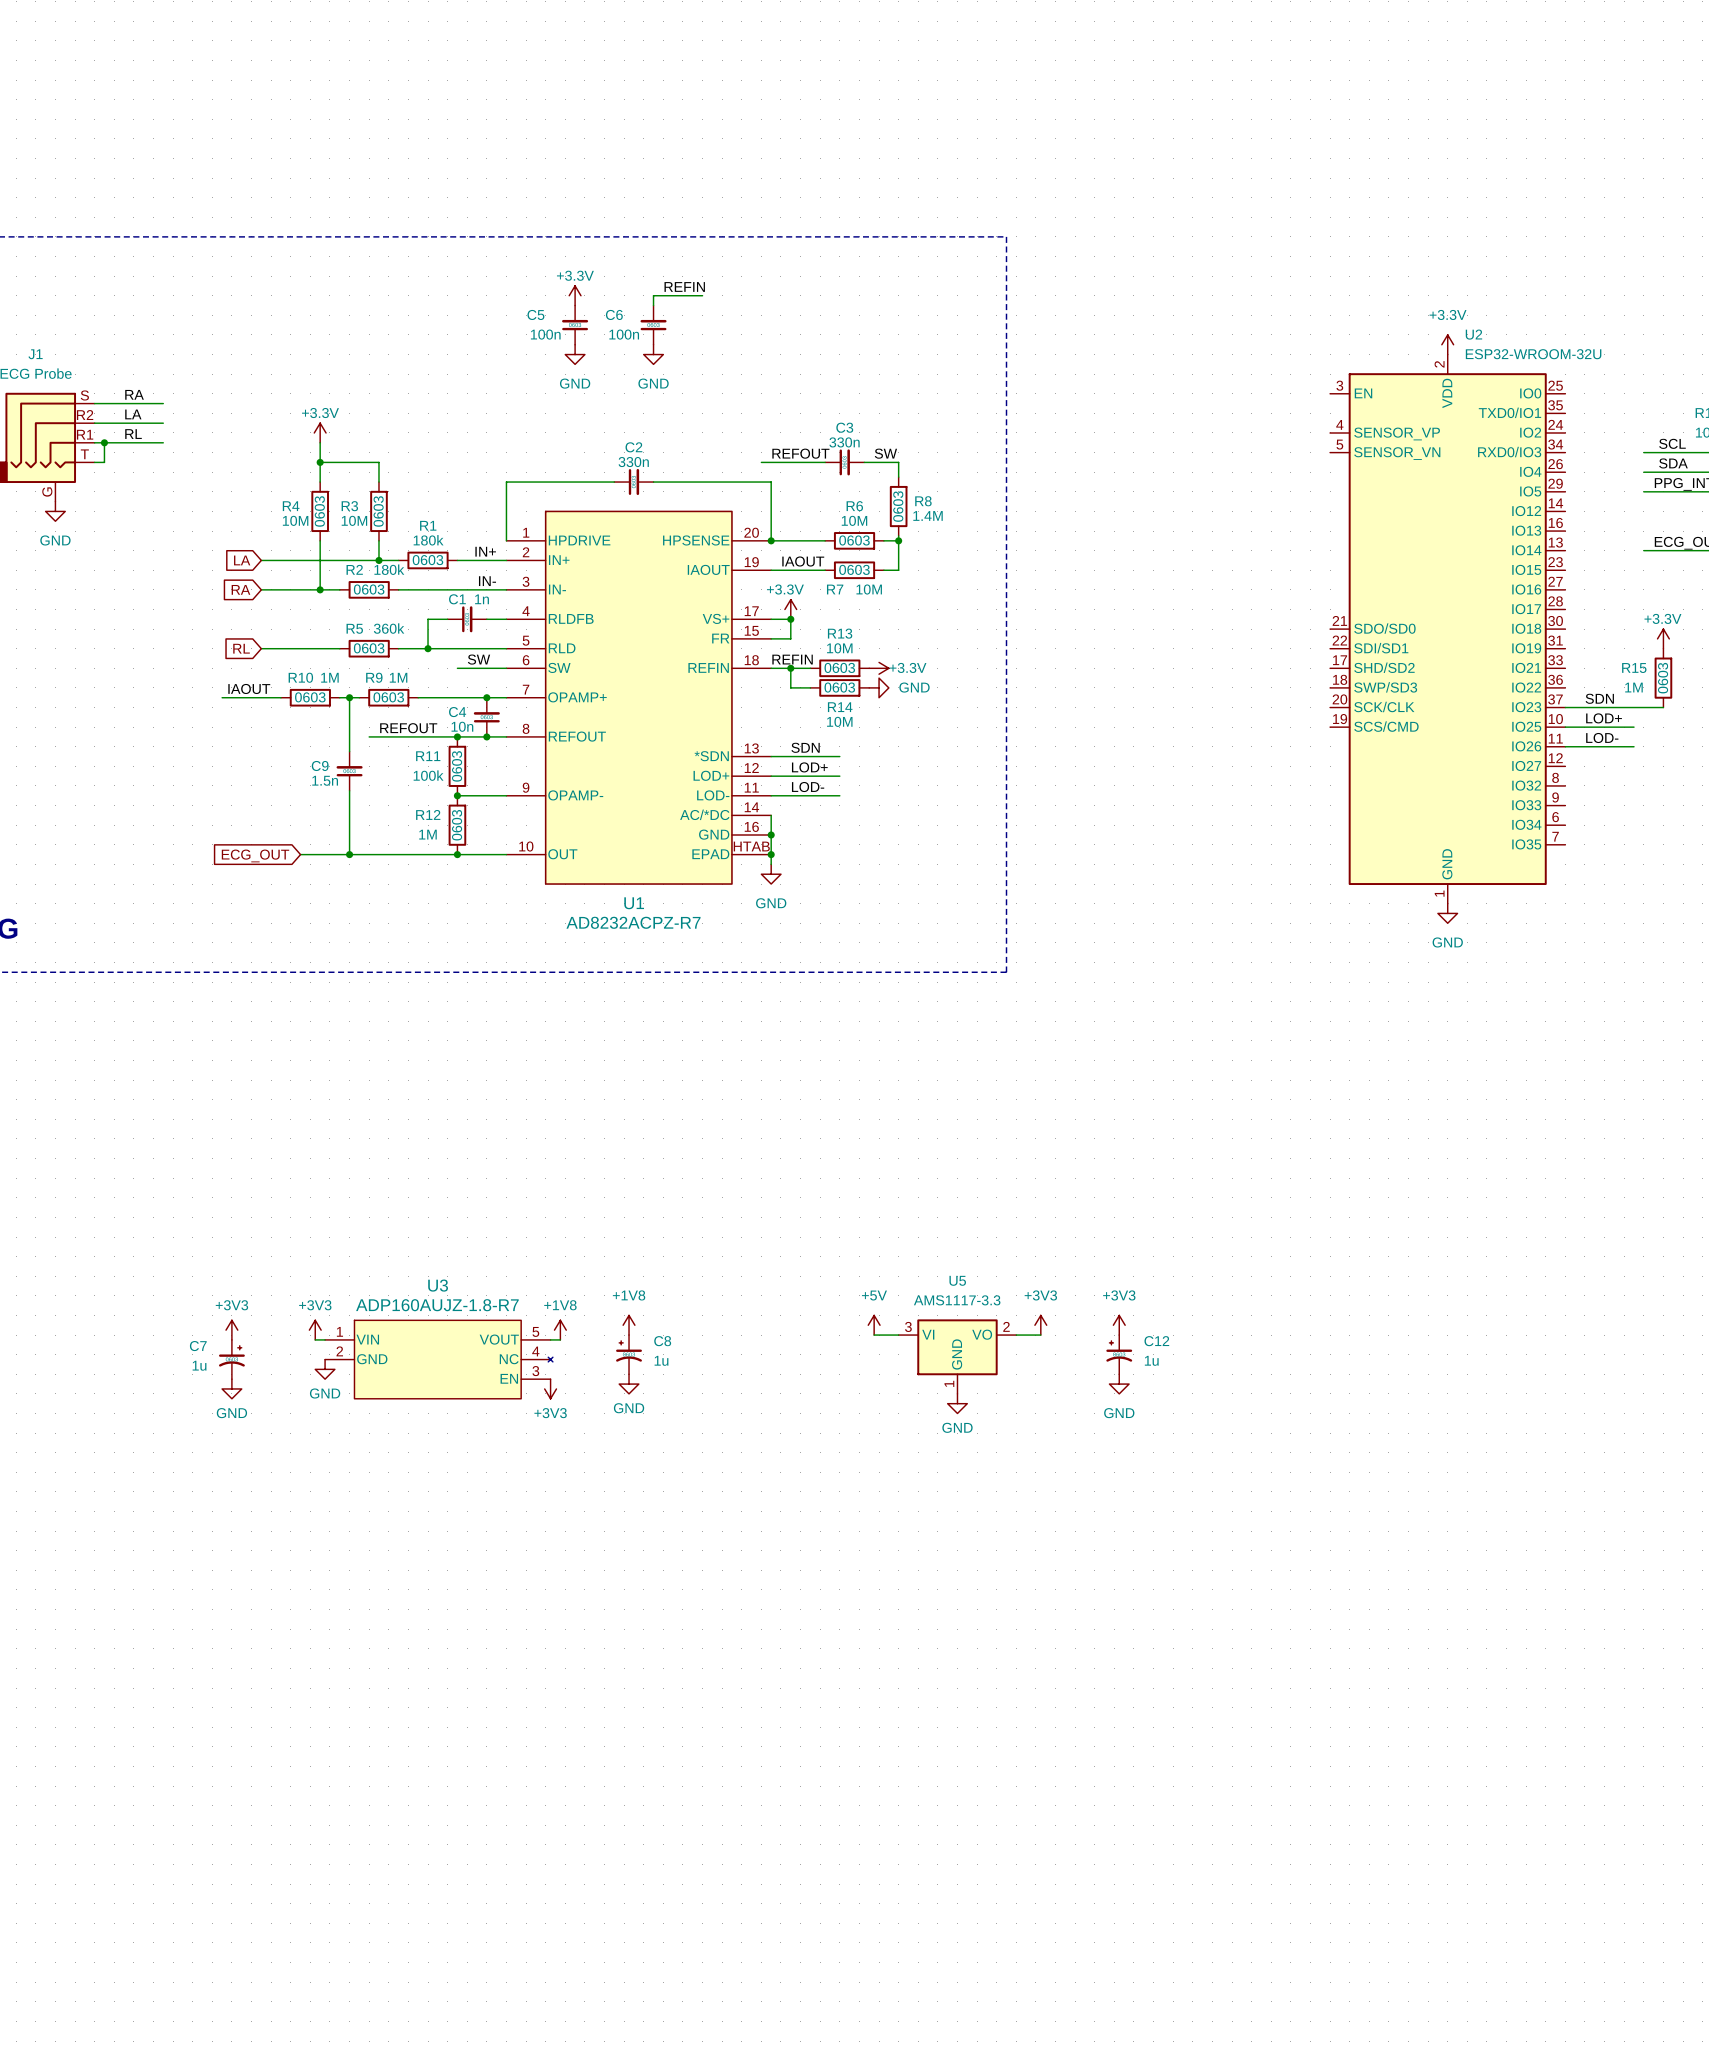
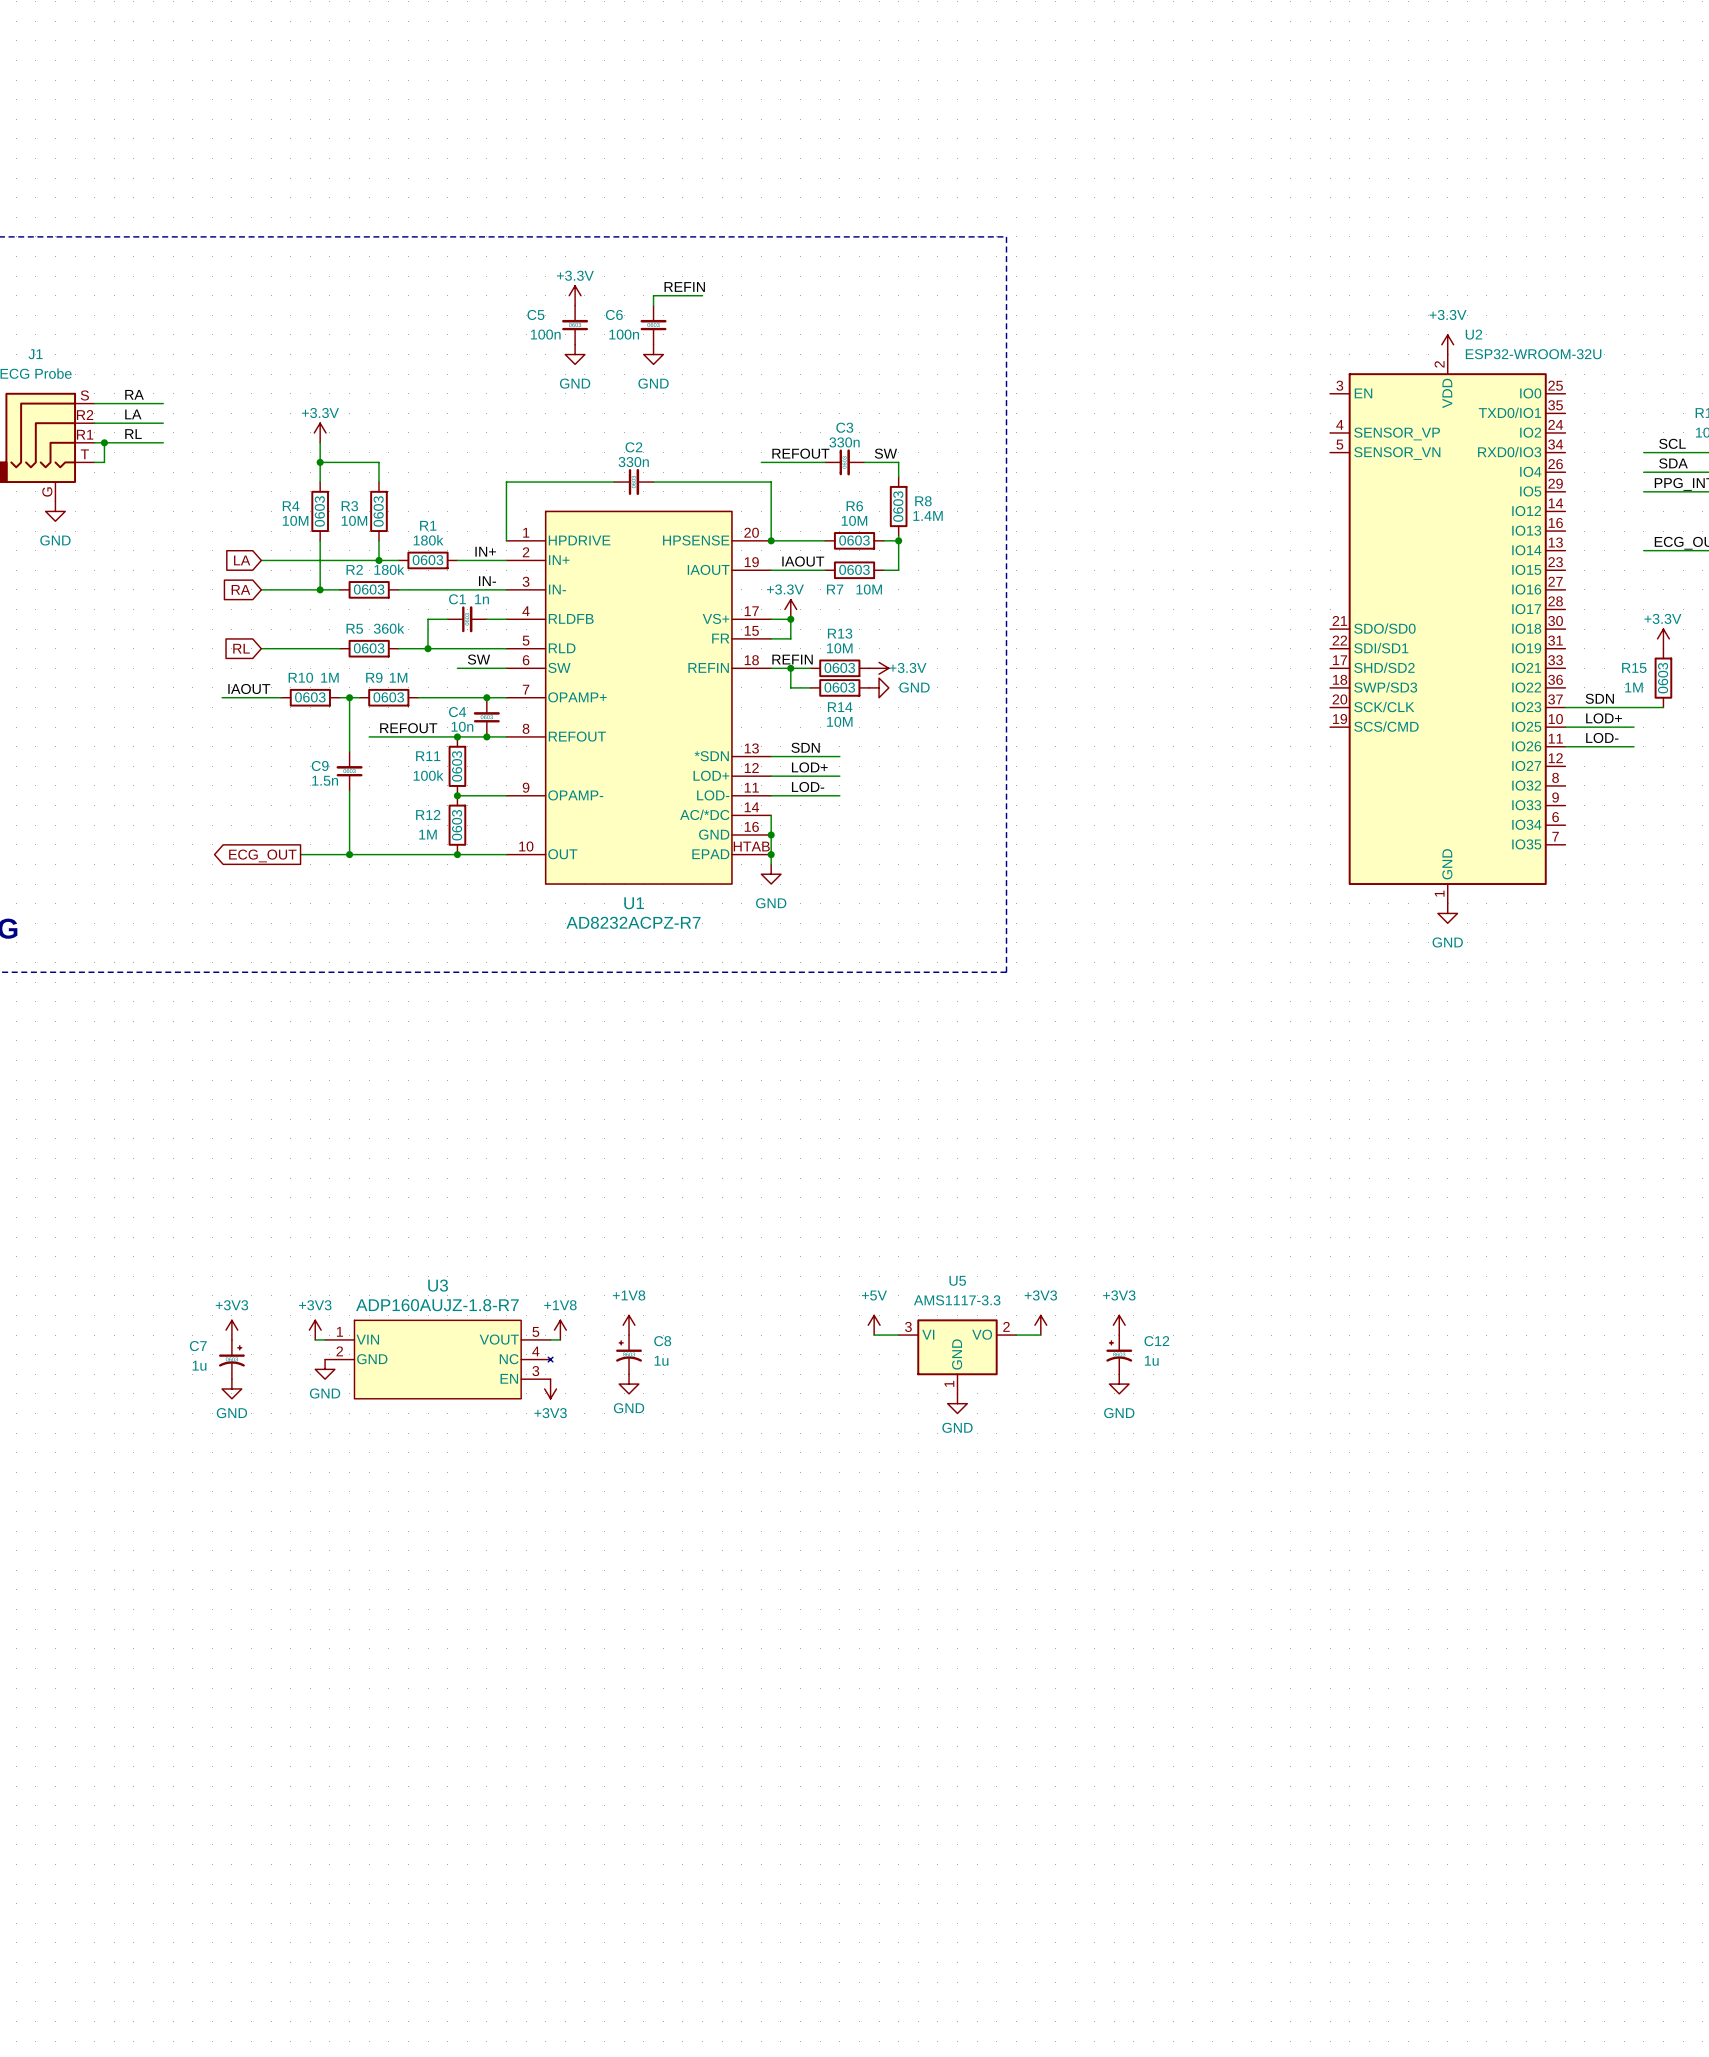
global label shape: input (255, 855) -> output (262, 855)

